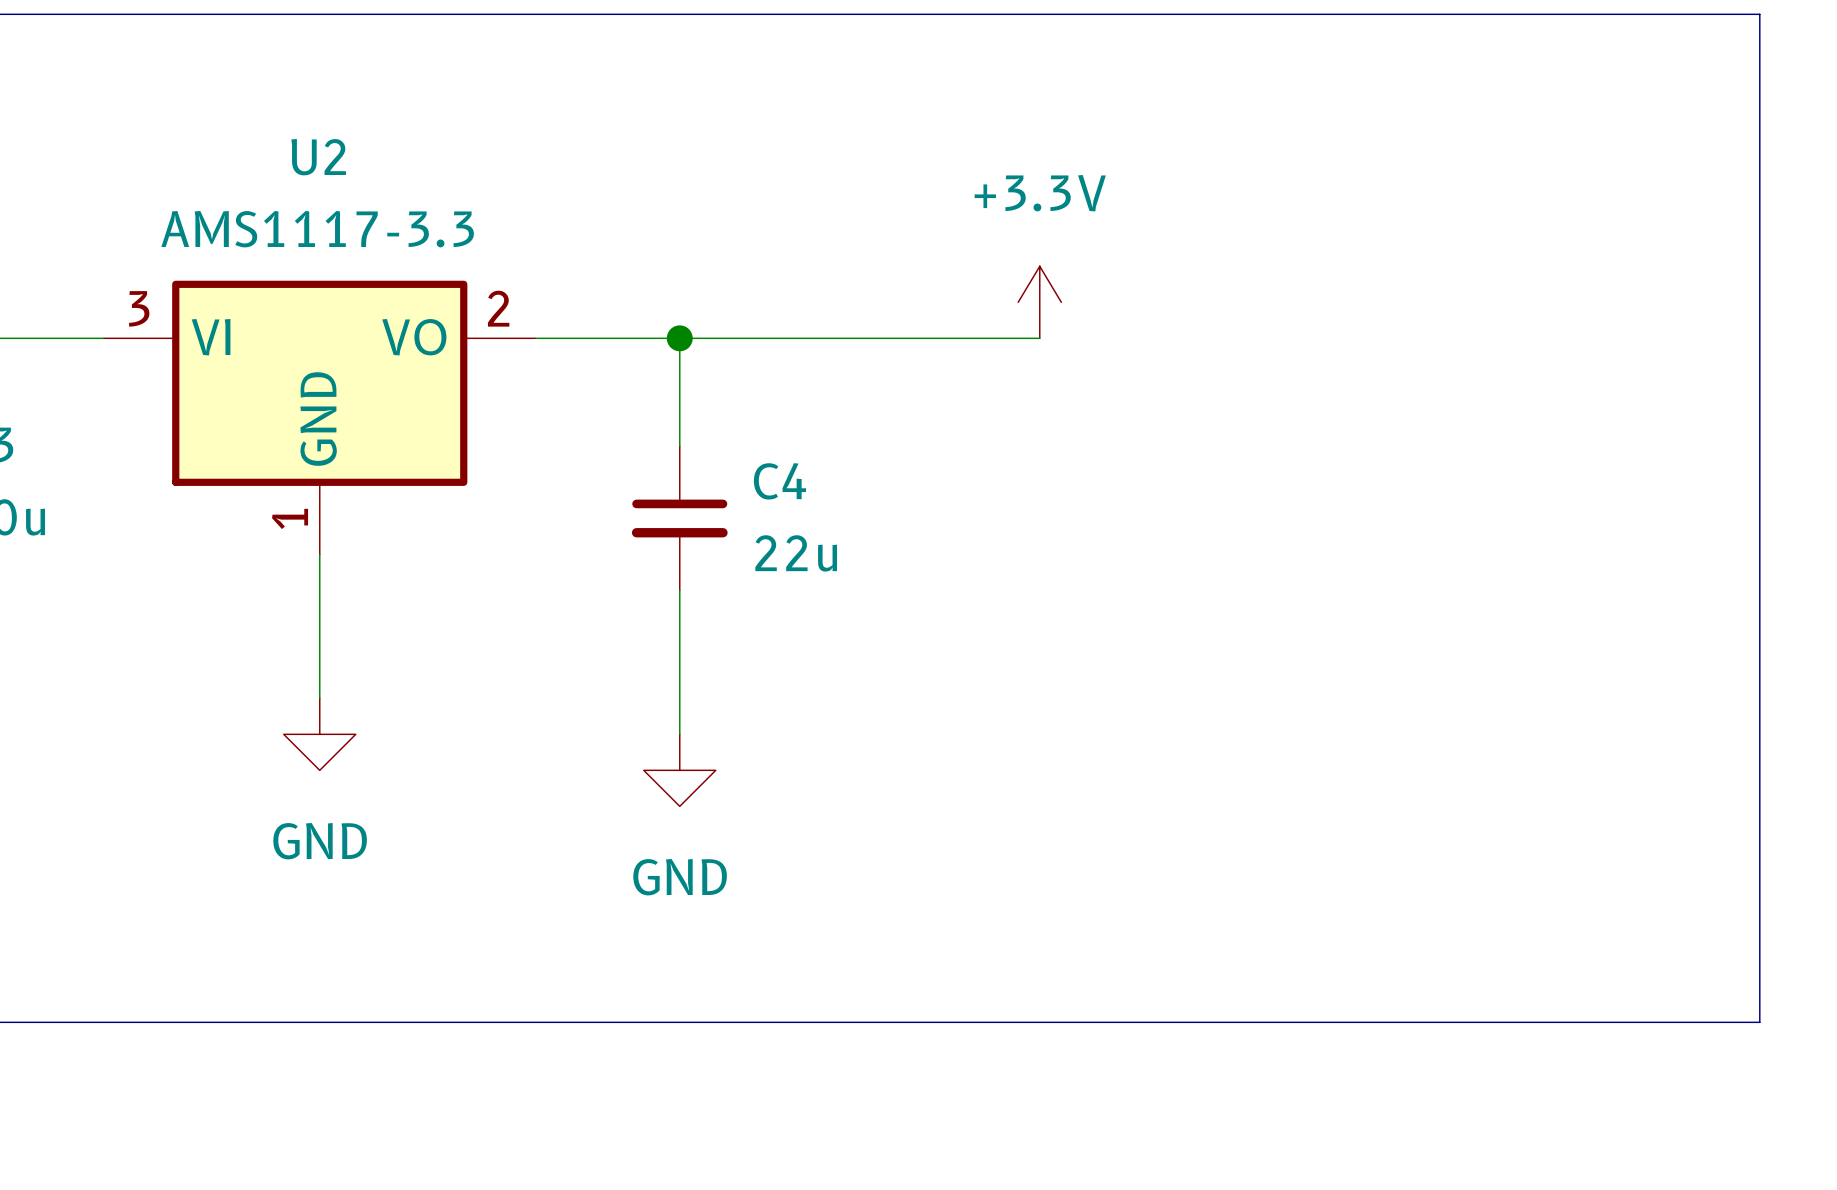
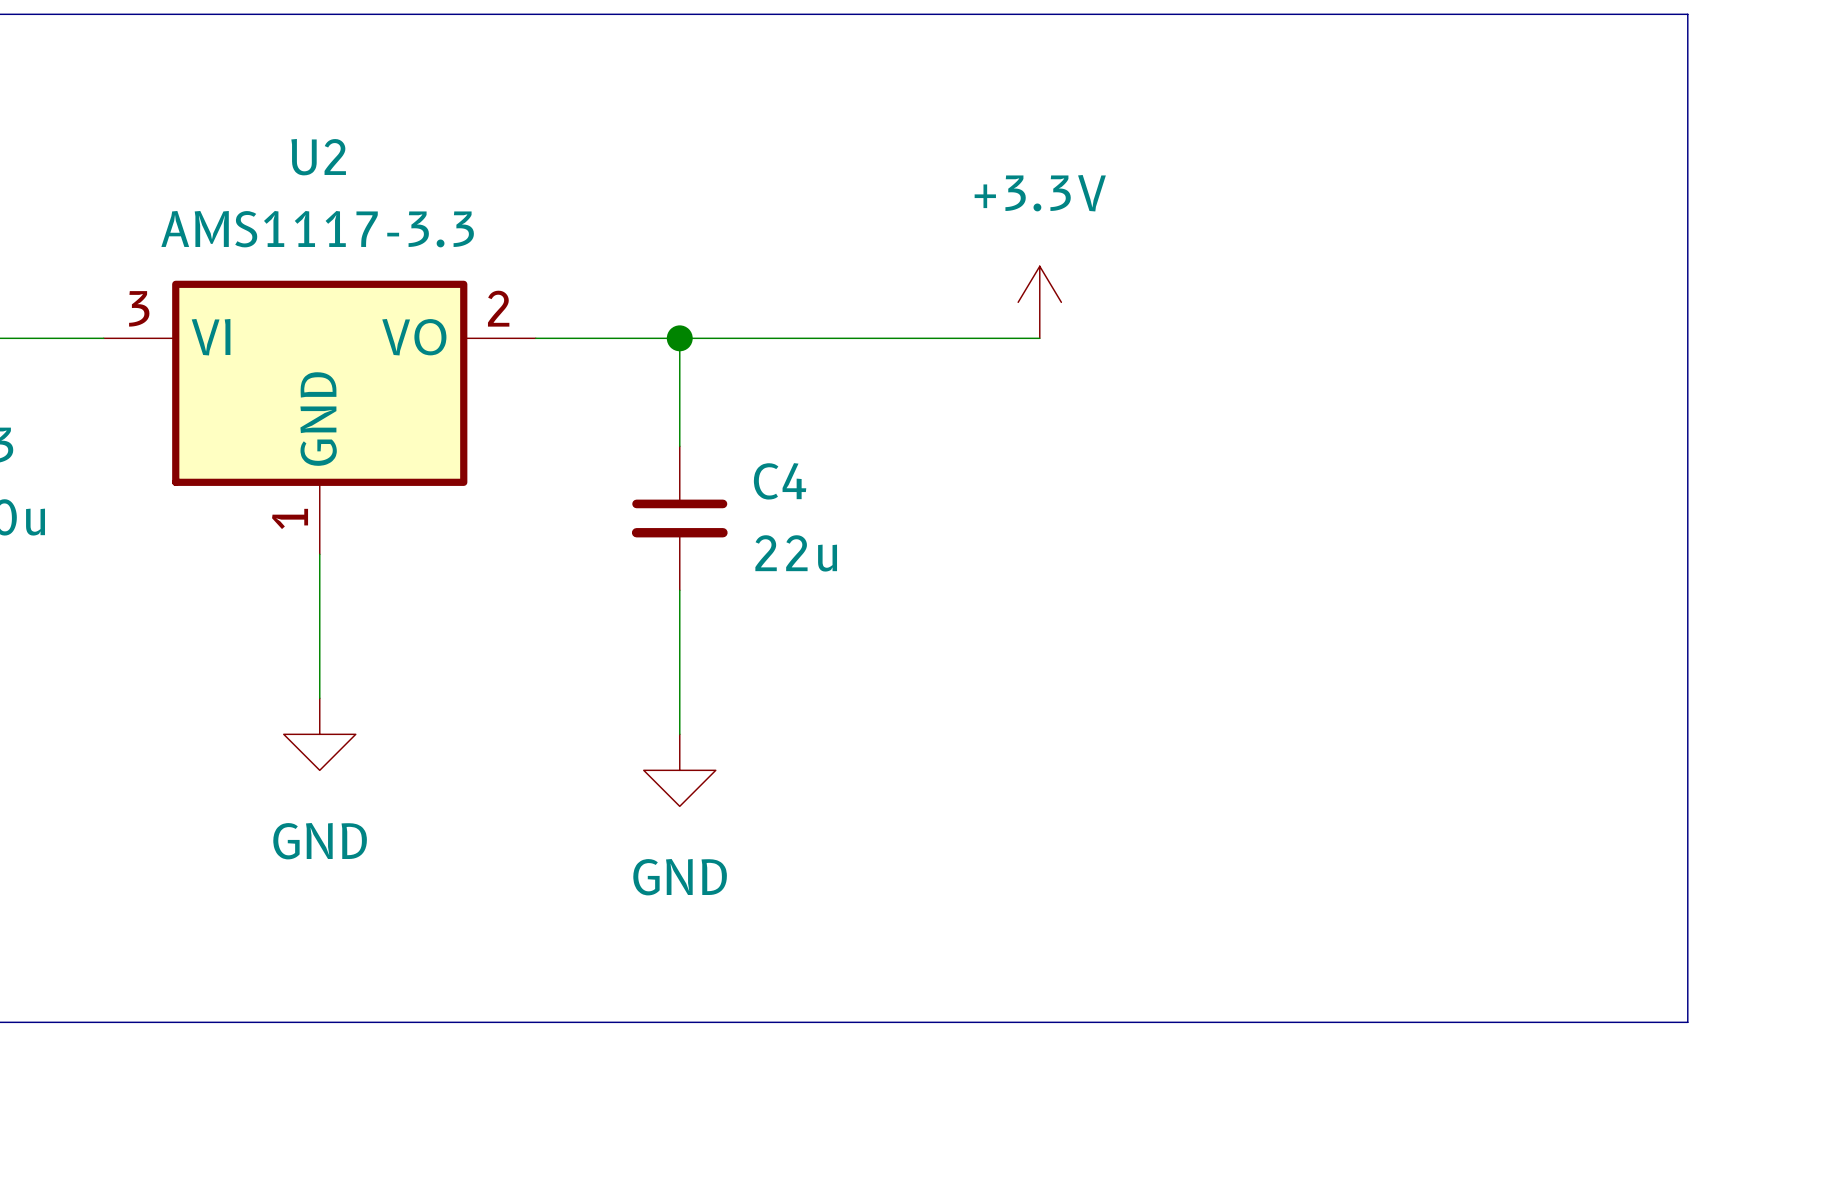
line: (1687, 14) (1759, 14) (1759, 1022) (1687, 1022) -> (1687, 14) (1687, 1022)

